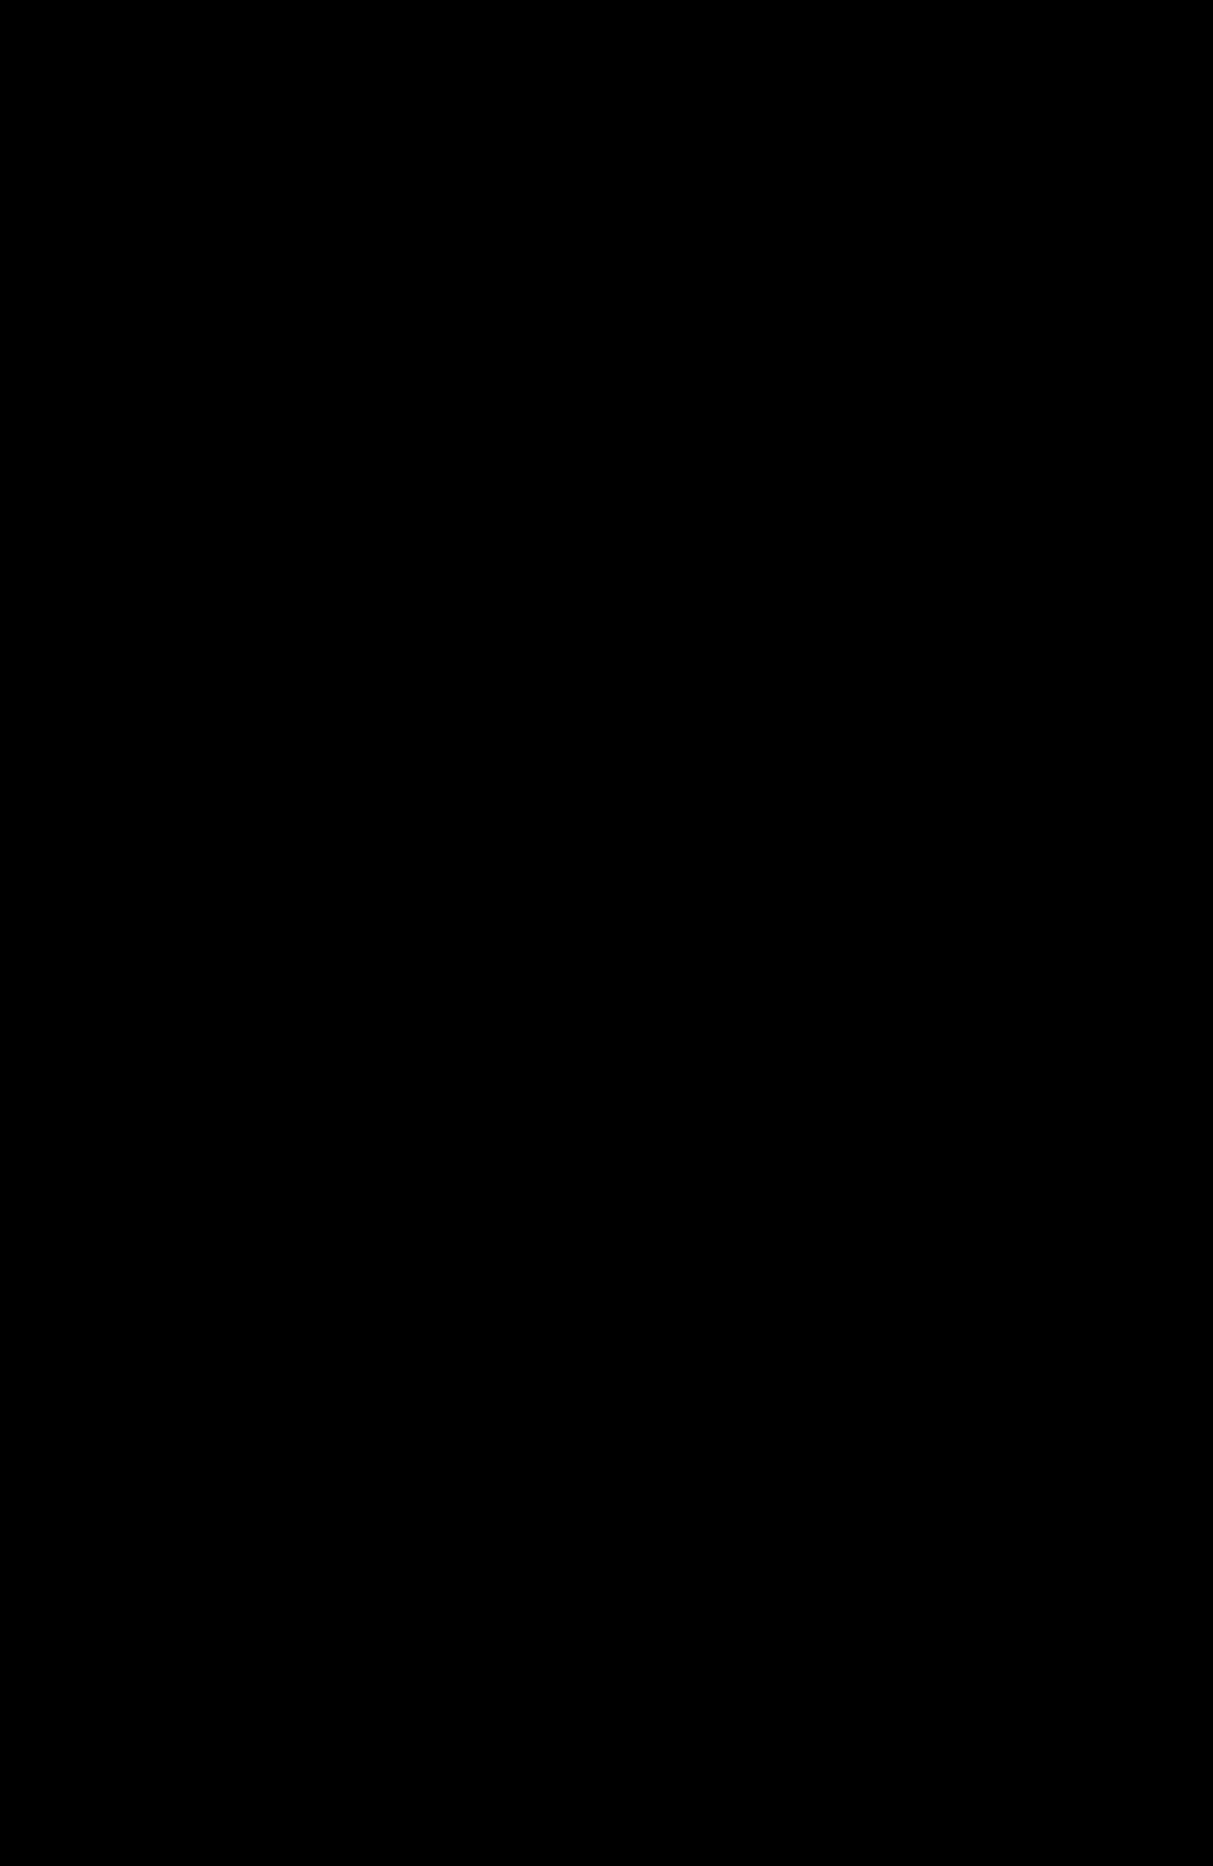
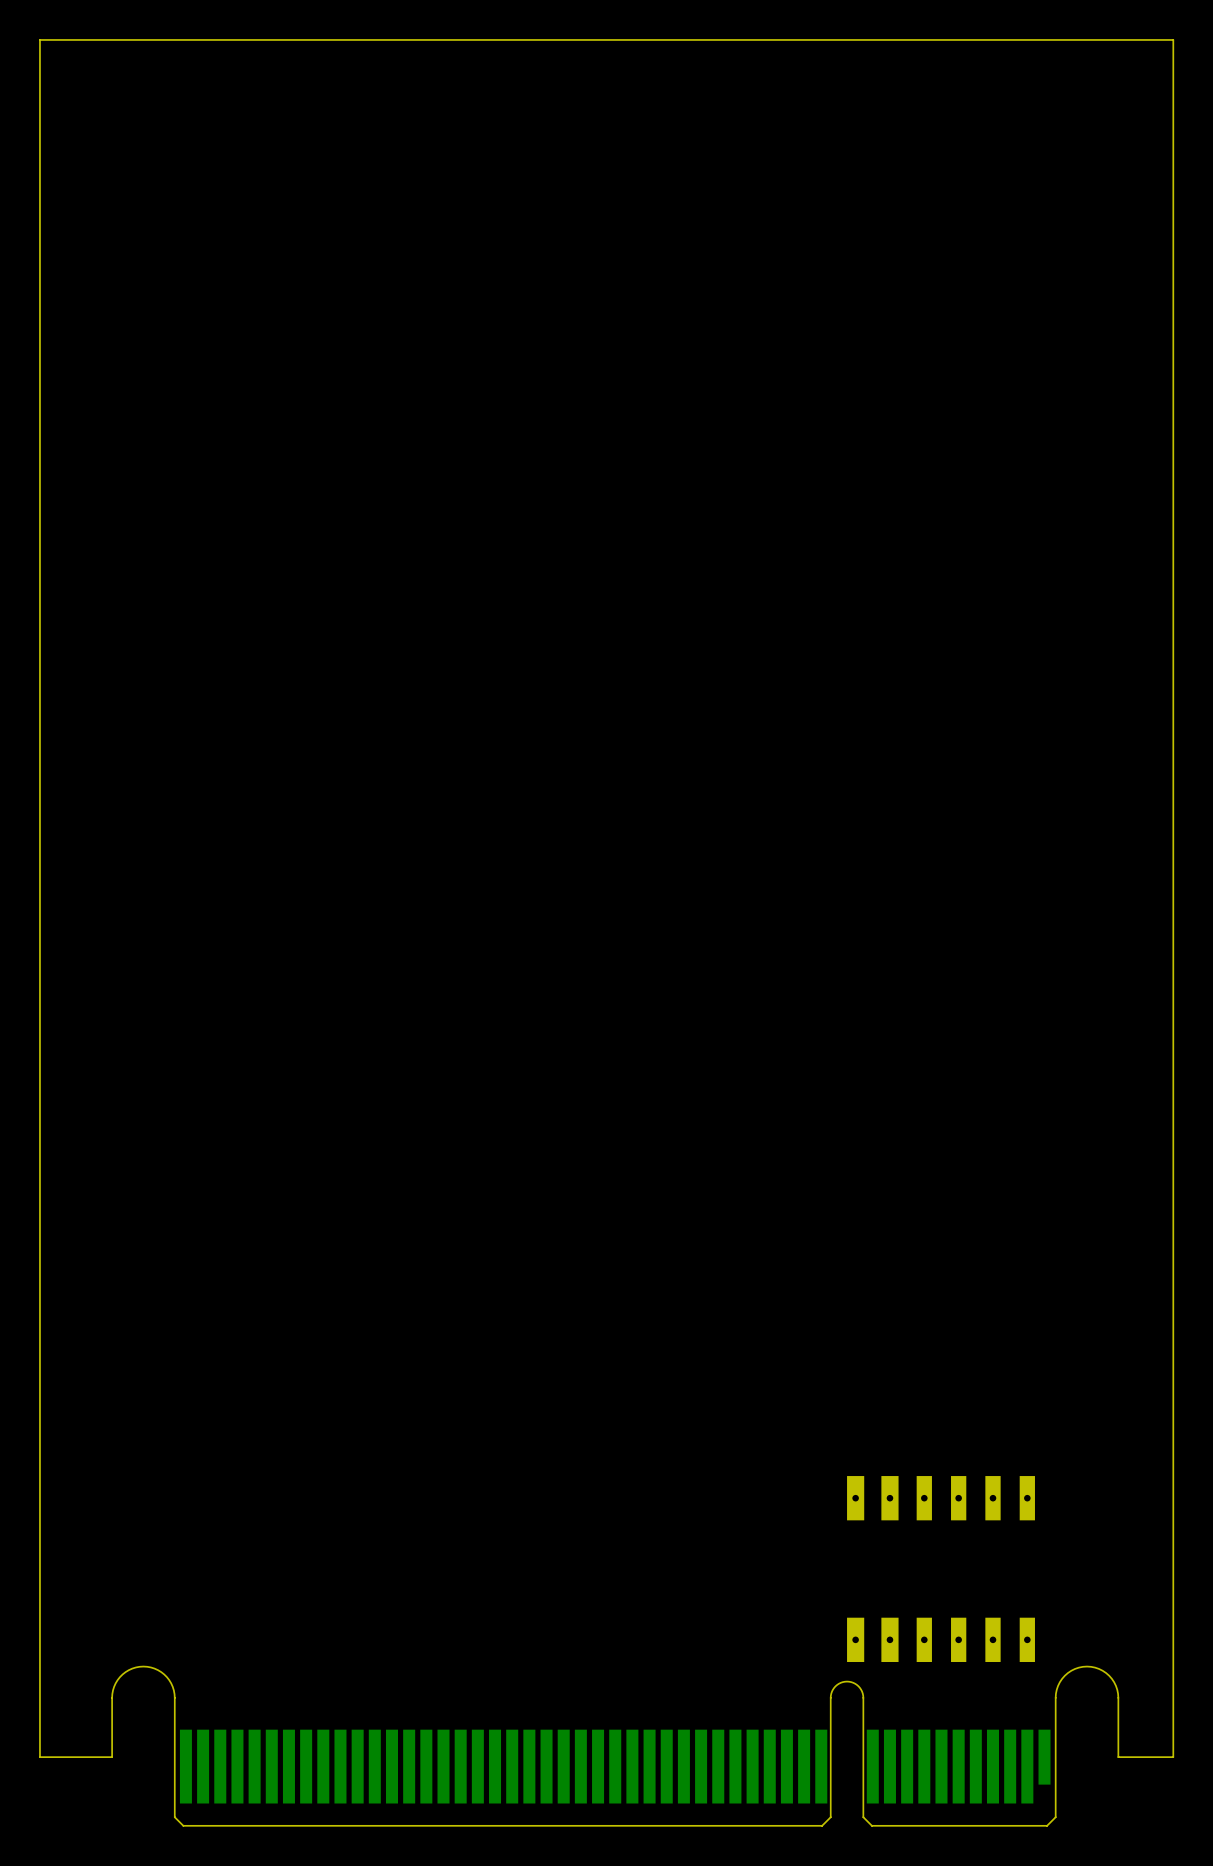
part: none -> (941, 1498)
part: none -> (941, 1639)
part: none -> (615, 1746)
board edge: none -> (1118, 1757) (1173, 1757) (1173, 39) (39, 39) (39, 1757) (112, 1757)

